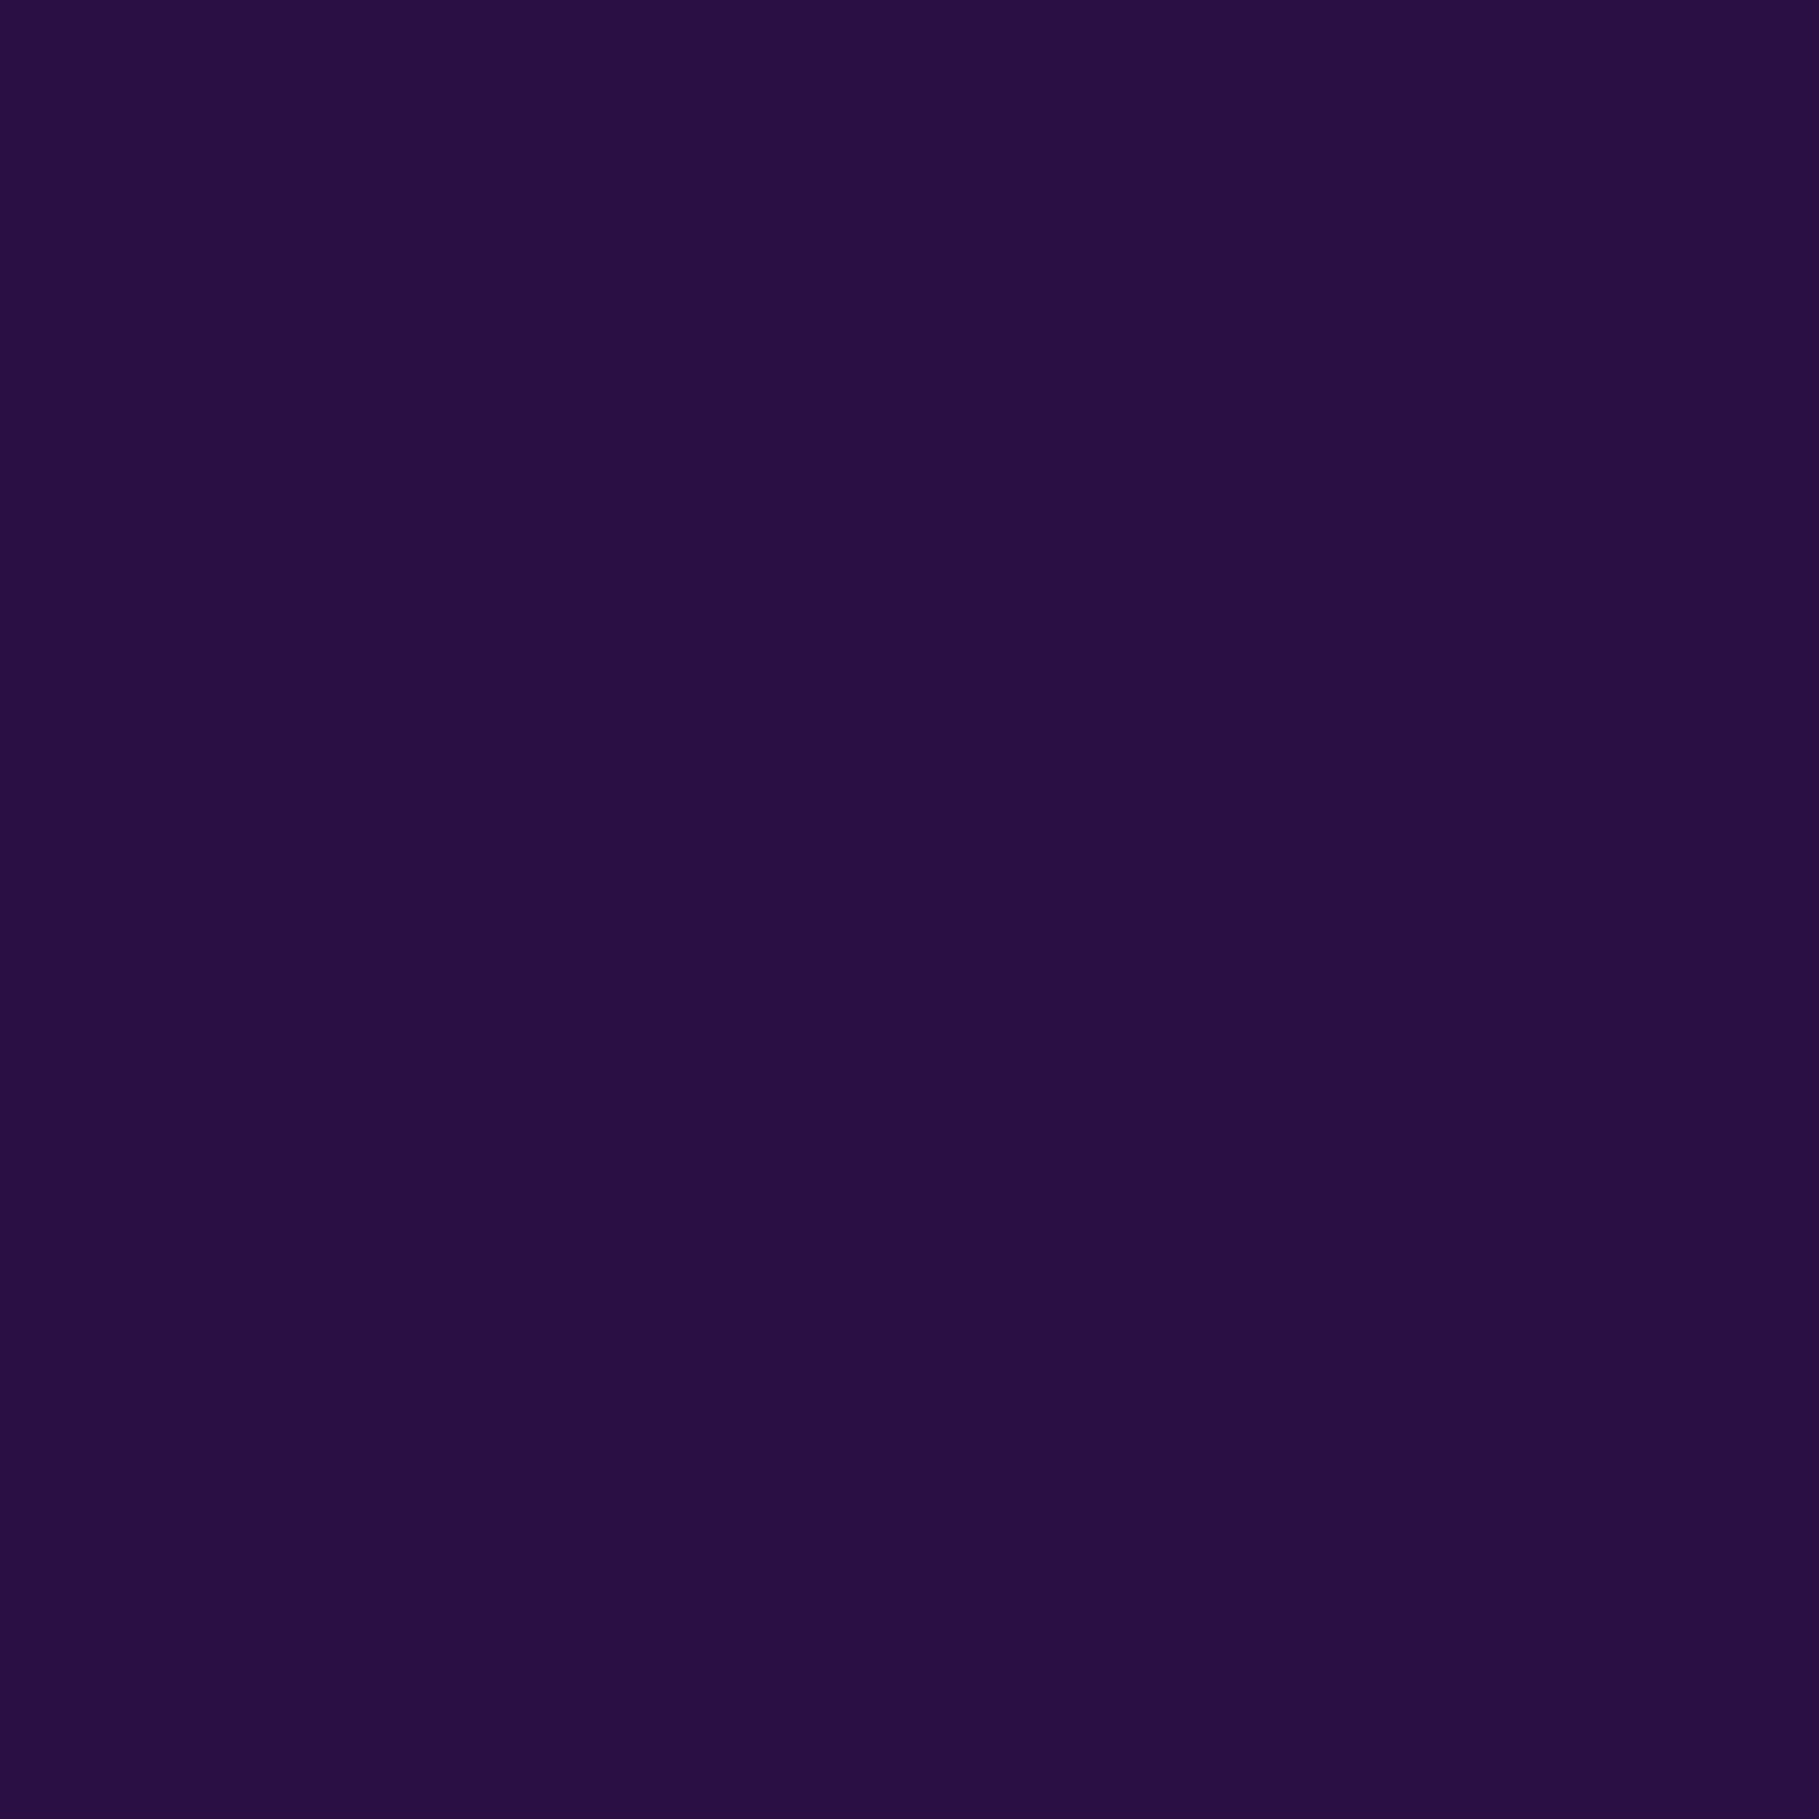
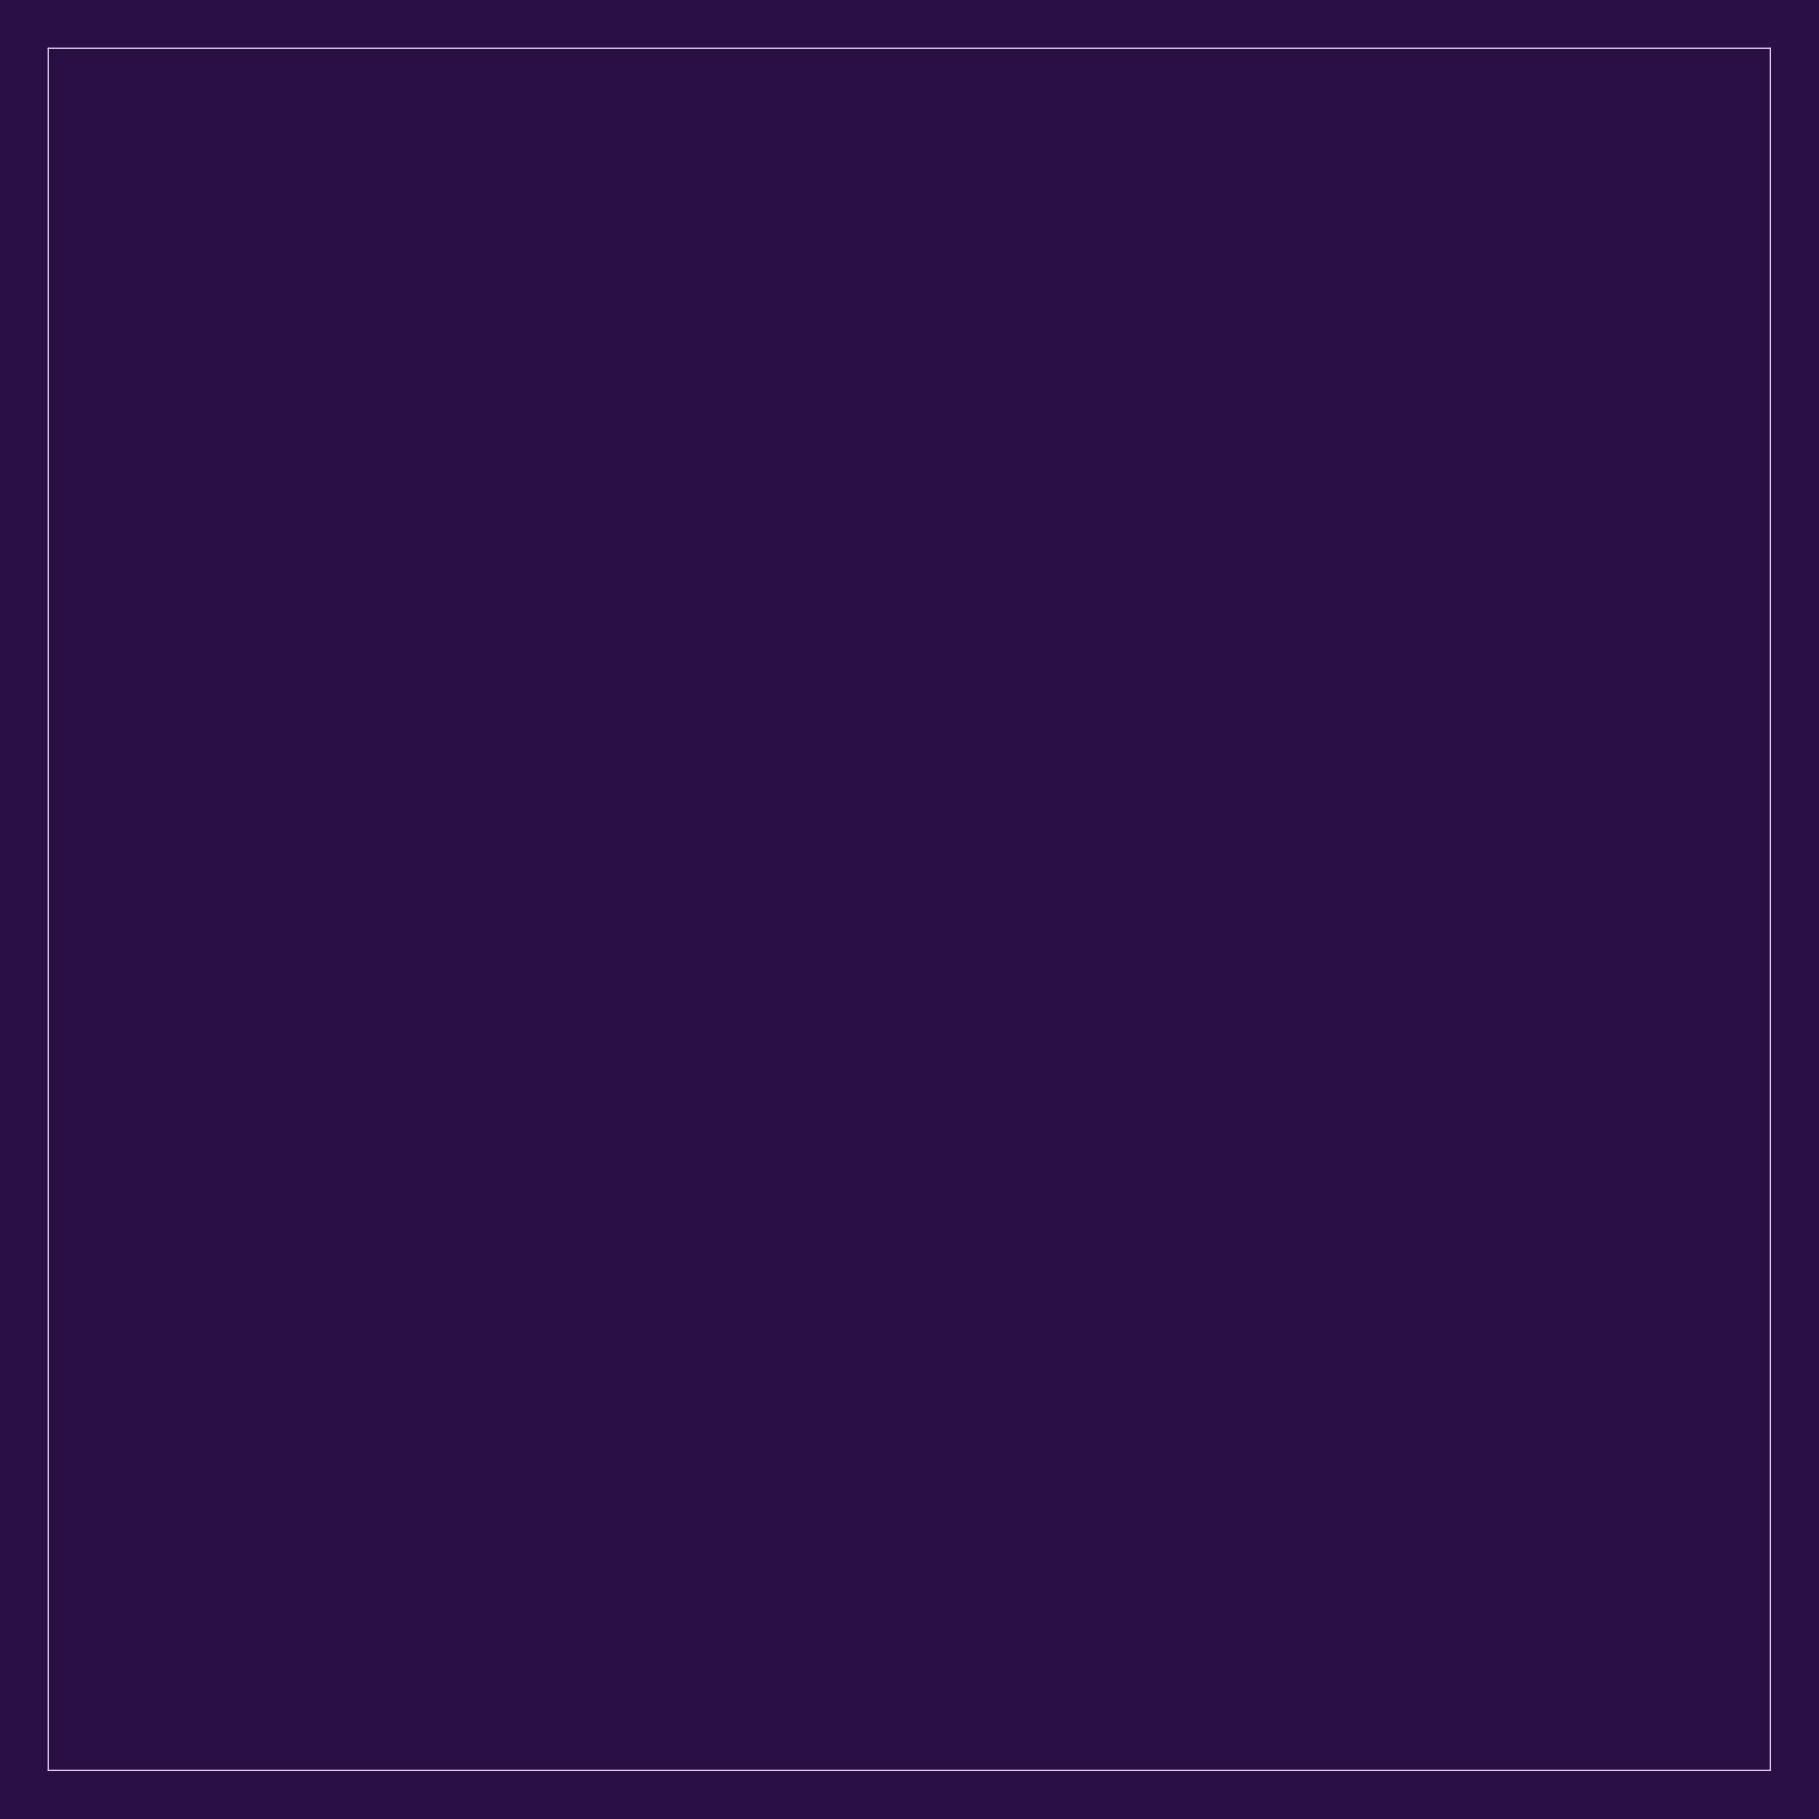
board edge: none -> (1770, 48) (48, 48) (48, 1770) (1770, 1770) (1770, 48)

